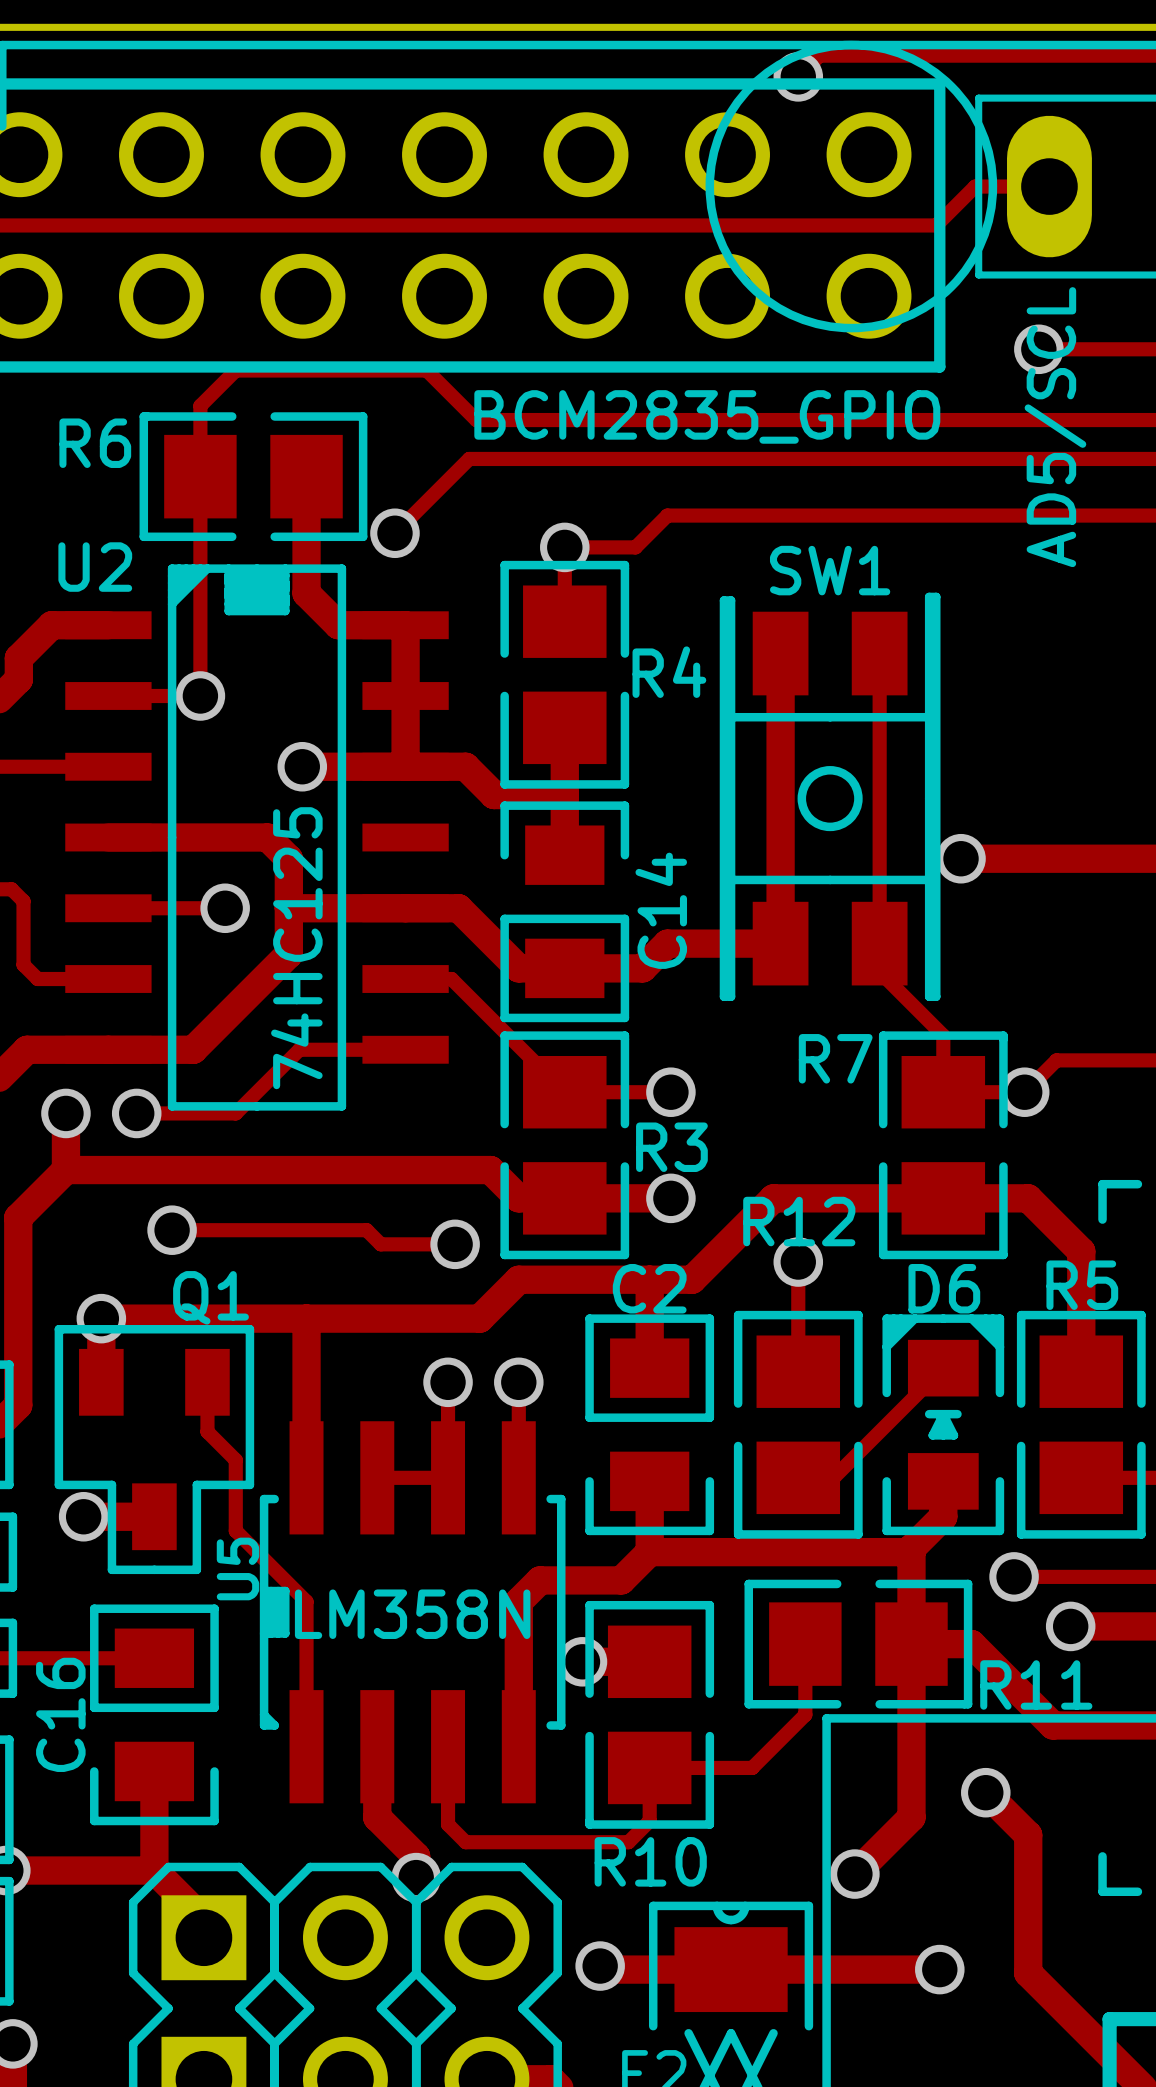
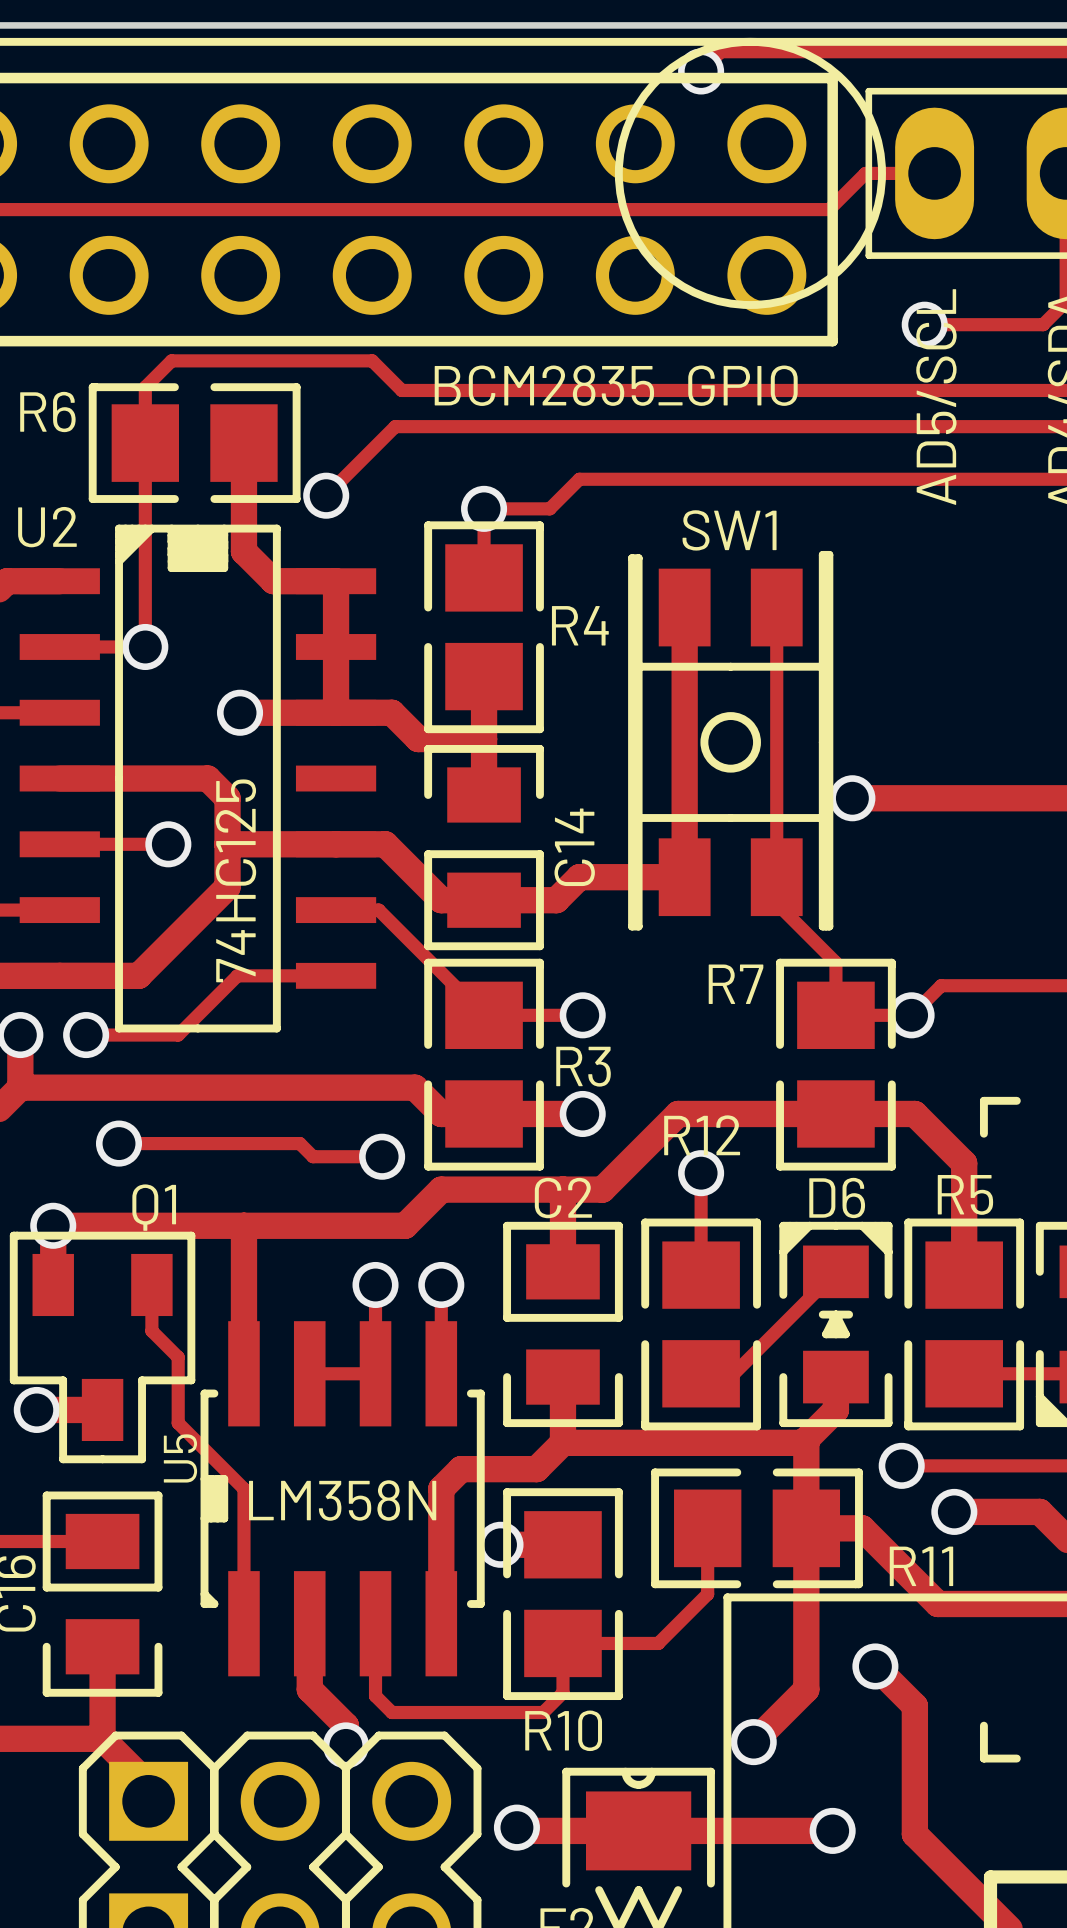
track: (444, 388) (426, 370) (235, 370) (200, 405) (200, 416) -> (372, 360) (171, 360) (145, 387)

